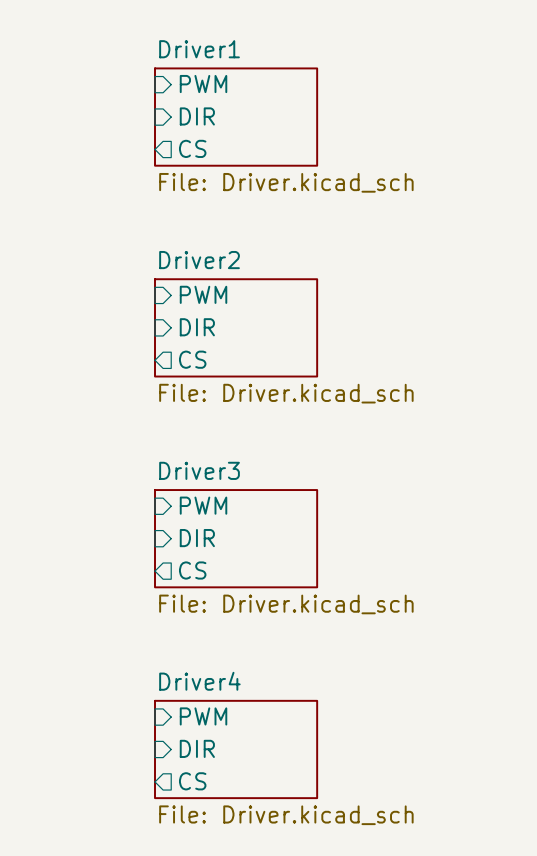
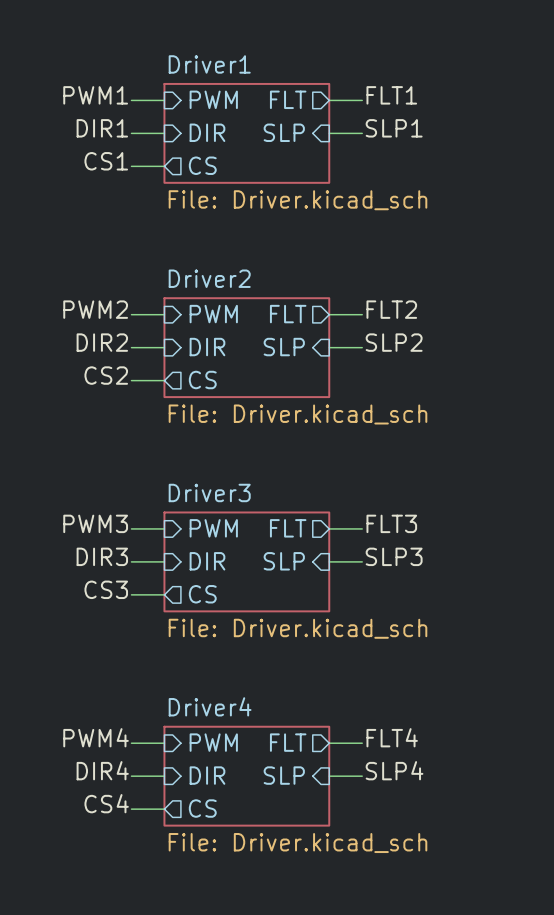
label: none -> PWM1 (95, 95)
label: none -> FLT1 (391, 95)
wire: none -> (131, 100) (164, 100)
sheet pin: none -> FLT (288, 99)
wire: none -> (329, 100) (362, 100)
label: none -> DIR1 (102, 128)
label: none -> SLP1 (394, 128)
sheet pin: none -> SLP (284, 132)
wire: none -> (131, 133) (164, 133)
wire: none -> (329, 133) (362, 133)
label: none -> CS1 (106, 161)
wire: none -> (131, 166) (164, 166)
label: none -> PWM2 (95, 309)
label: none -> FLT2 (391, 309)
sheet pin: none -> FLT (288, 314)
wire: none -> (131, 314) (164, 314)
wire: none -> (329, 314) (362, 314)
label: none -> DIR2 (102, 342)
label: none -> SLP2 (394, 342)
wire: none -> (131, 347) (164, 347)
sheet pin: none -> SLP (284, 347)
wire: none -> (329, 347) (362, 347)
label: none -> CS2 (106, 375)
wire: none -> (131, 380) (164, 380)
label: none -> PWM3 (95, 523)
label: none -> FLT3 (391, 523)
sheet pin: none -> FLT (288, 528)
wire: none -> (131, 528) (164, 528)
wire: none -> (329, 528) (362, 528)
label: none -> DIR3 (102, 556)
label: none -> SLP3 (394, 556)
wire: none -> (131, 561) (164, 561)
sheet pin: none -> SLP (284, 561)
wire: none -> (329, 561) (362, 561)
label: none -> CS3 (106, 589)
wire: none -> (131, 594) (164, 594)
label: none -> PWM4 (96, 737)
label: none -> FLT4 (392, 737)
sheet pin: none -> FLT (288, 742)
wire: none -> (131, 743) (164, 743)
wire: none -> (329, 743) (362, 743)
label: none -> DIR4 (102, 770)
label: none -> SLP4 (394, 770)
sheet pin: none -> SLP (284, 775)
wire: none -> (131, 776) (164, 776)
wire: none -> (329, 776) (362, 776)
label: none -> CS4 (106, 803)
wire: none -> (131, 809) (164, 809)

